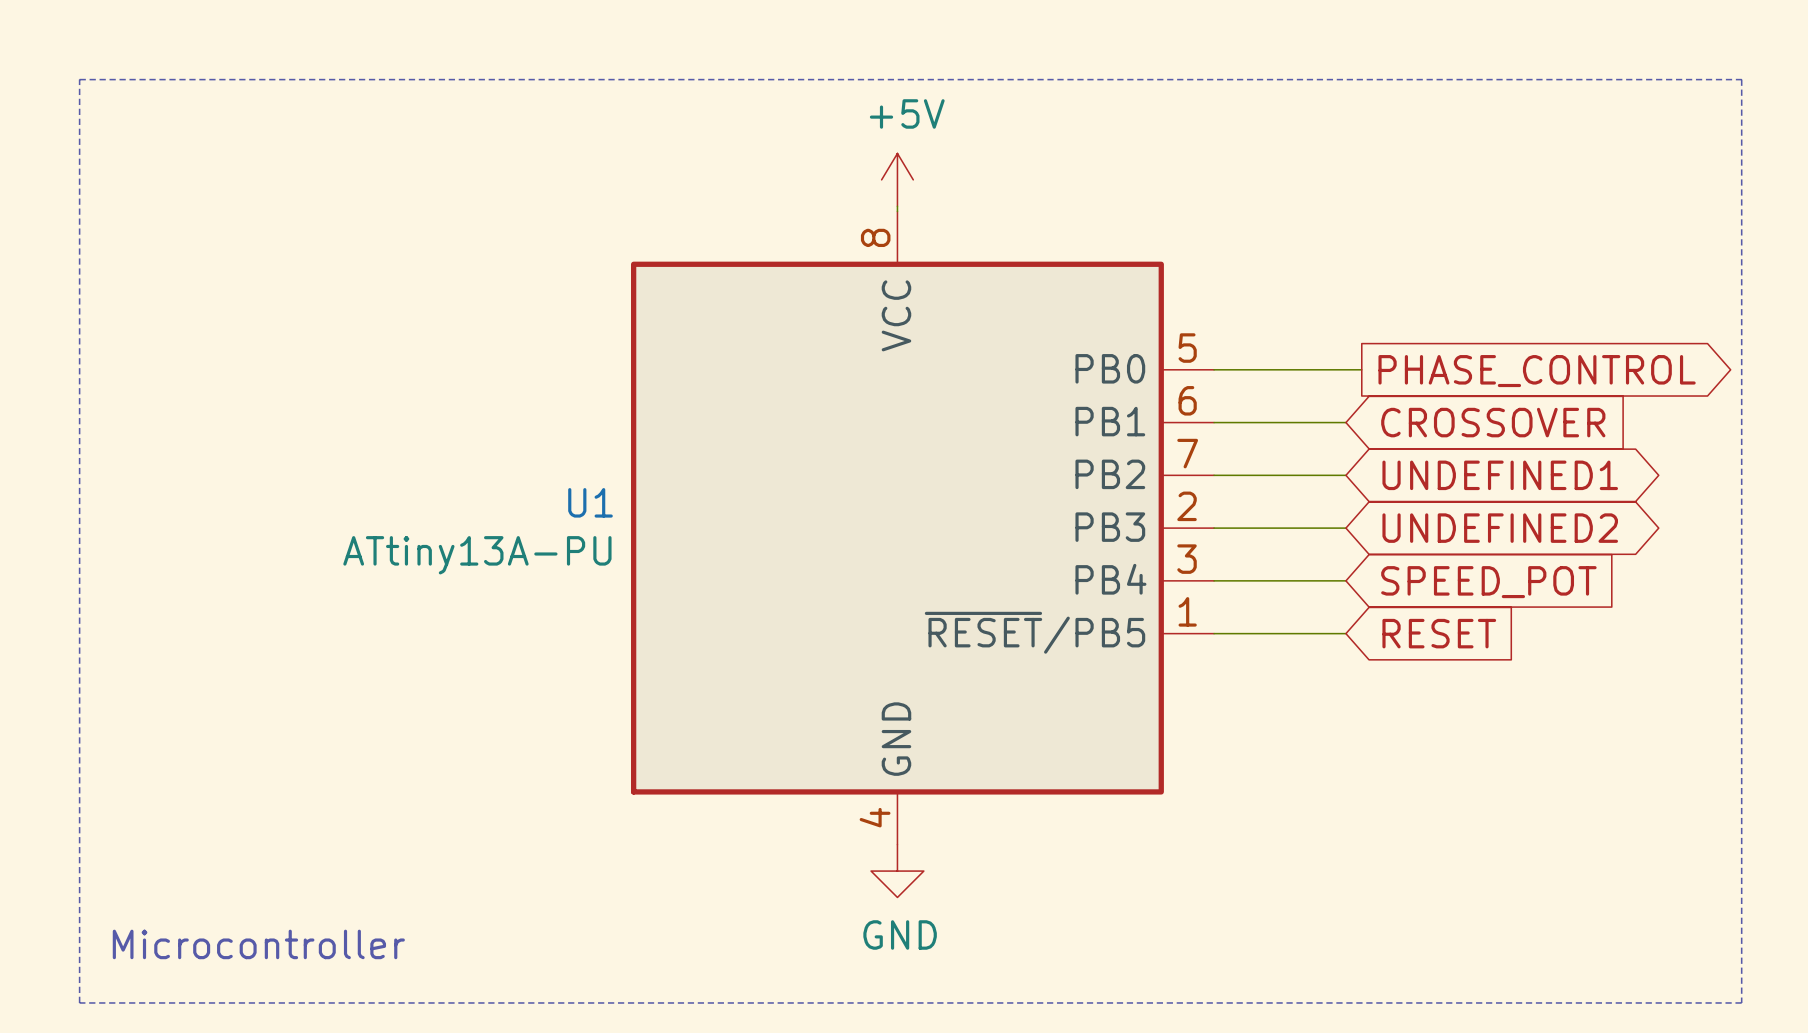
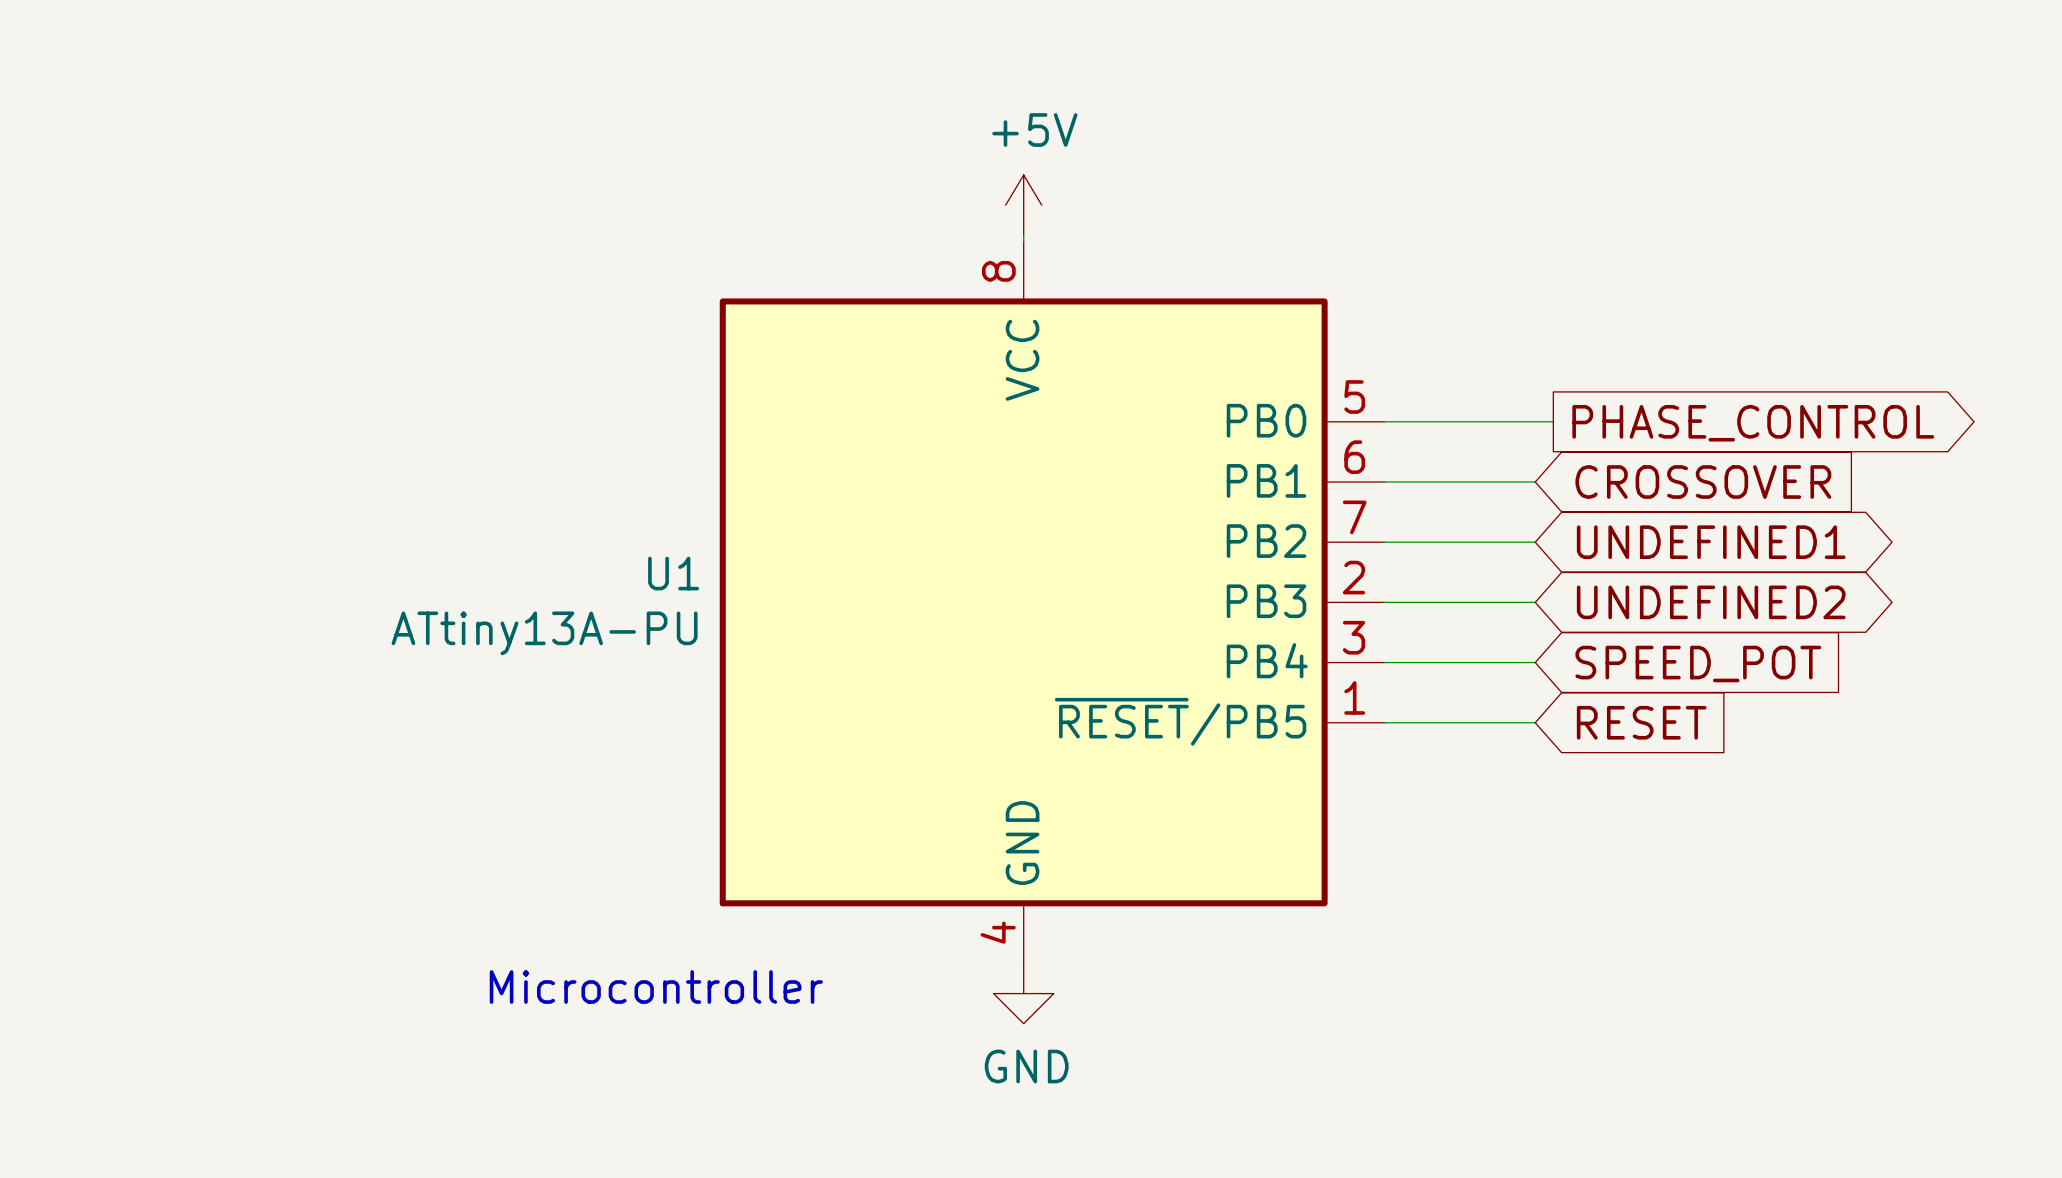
line: (79, 79) (79, 1002) (1741, 1002) (1741, 79) (79, 79) -> none
text position: Microcontroller (258, 944) -> Microcontroller (656, 986)

